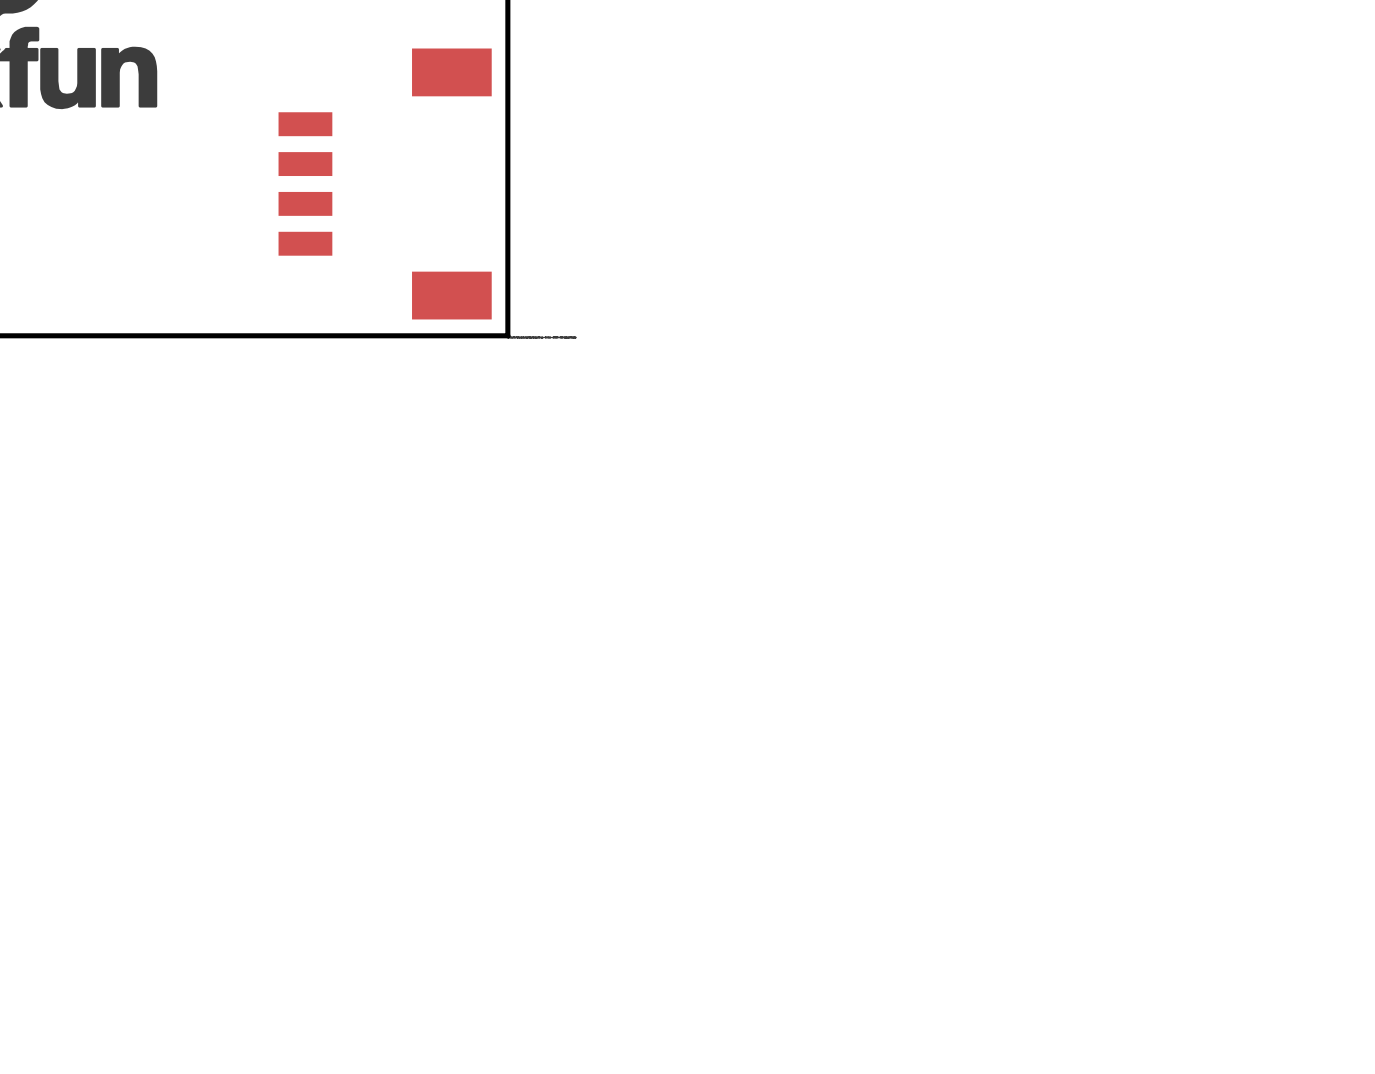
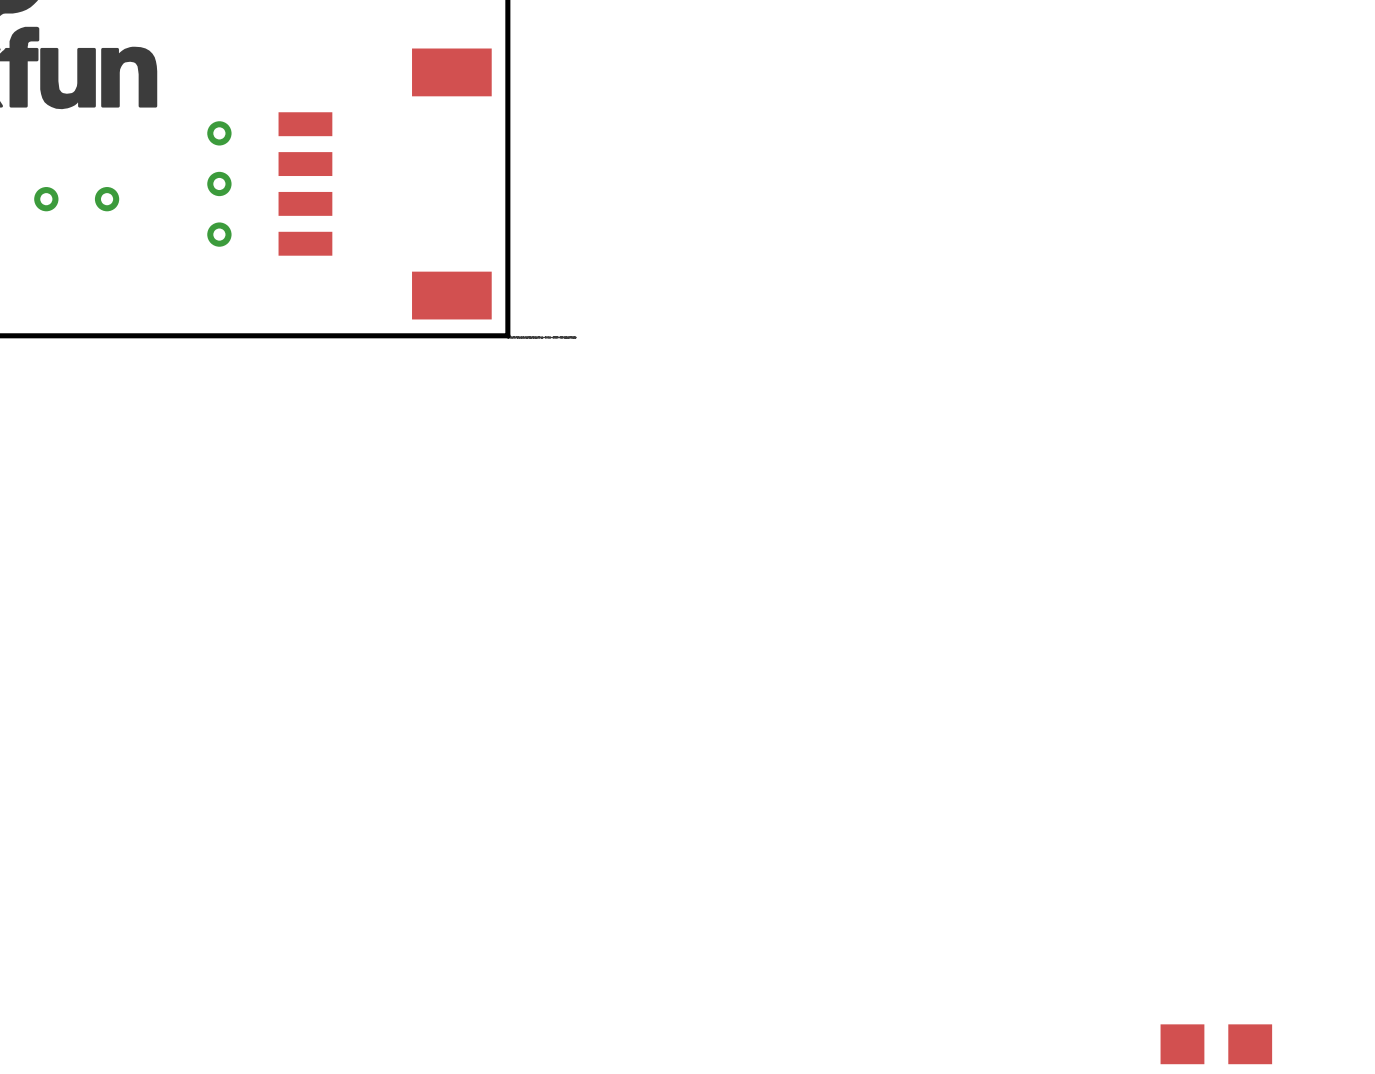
via: none -> (219, 133)
via: none -> (219, 183)
via: none -> (46, 199)
via: none -> (107, 199)
via: none -> (219, 234)
part: none -> (1216, 1044)

